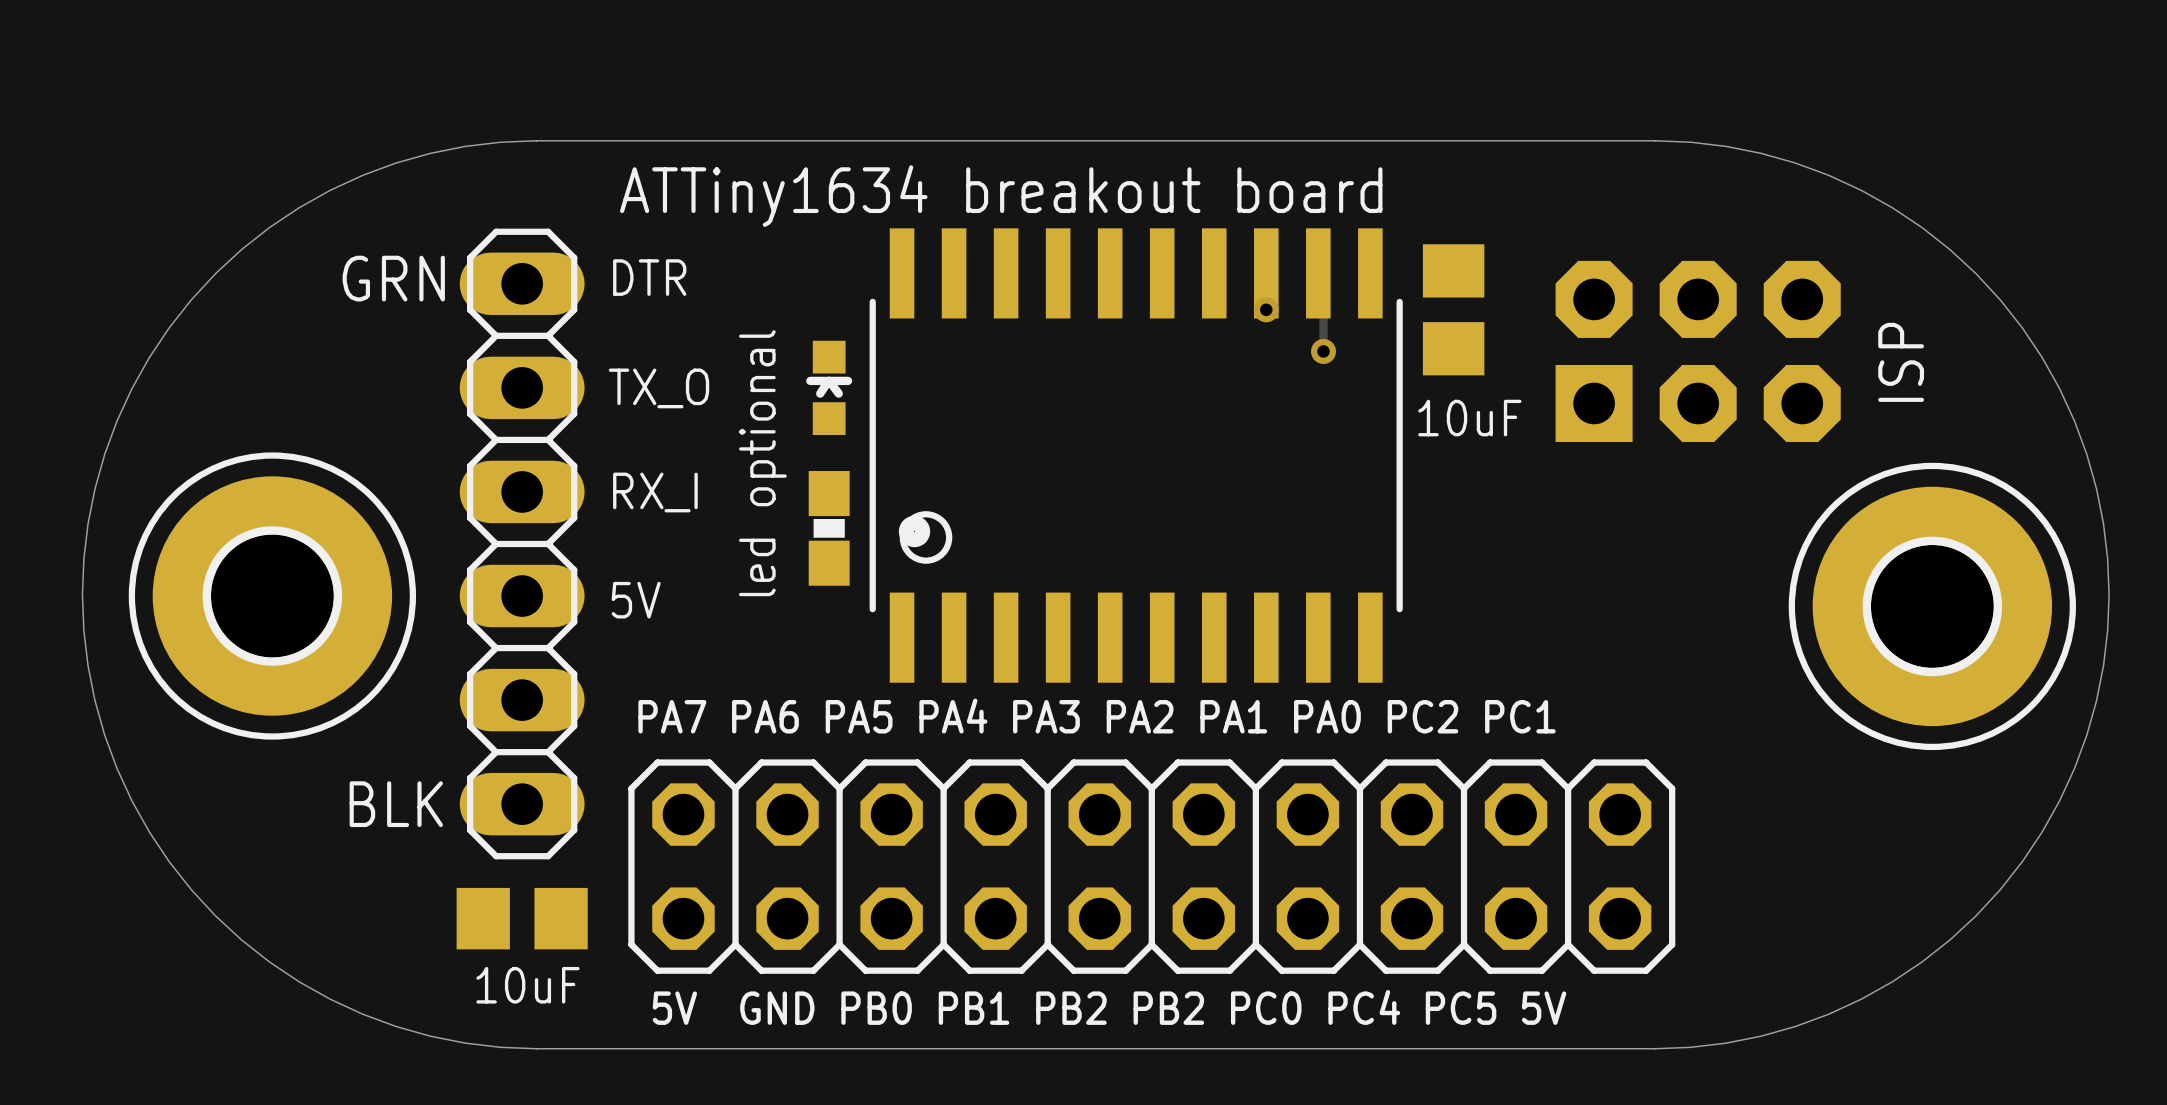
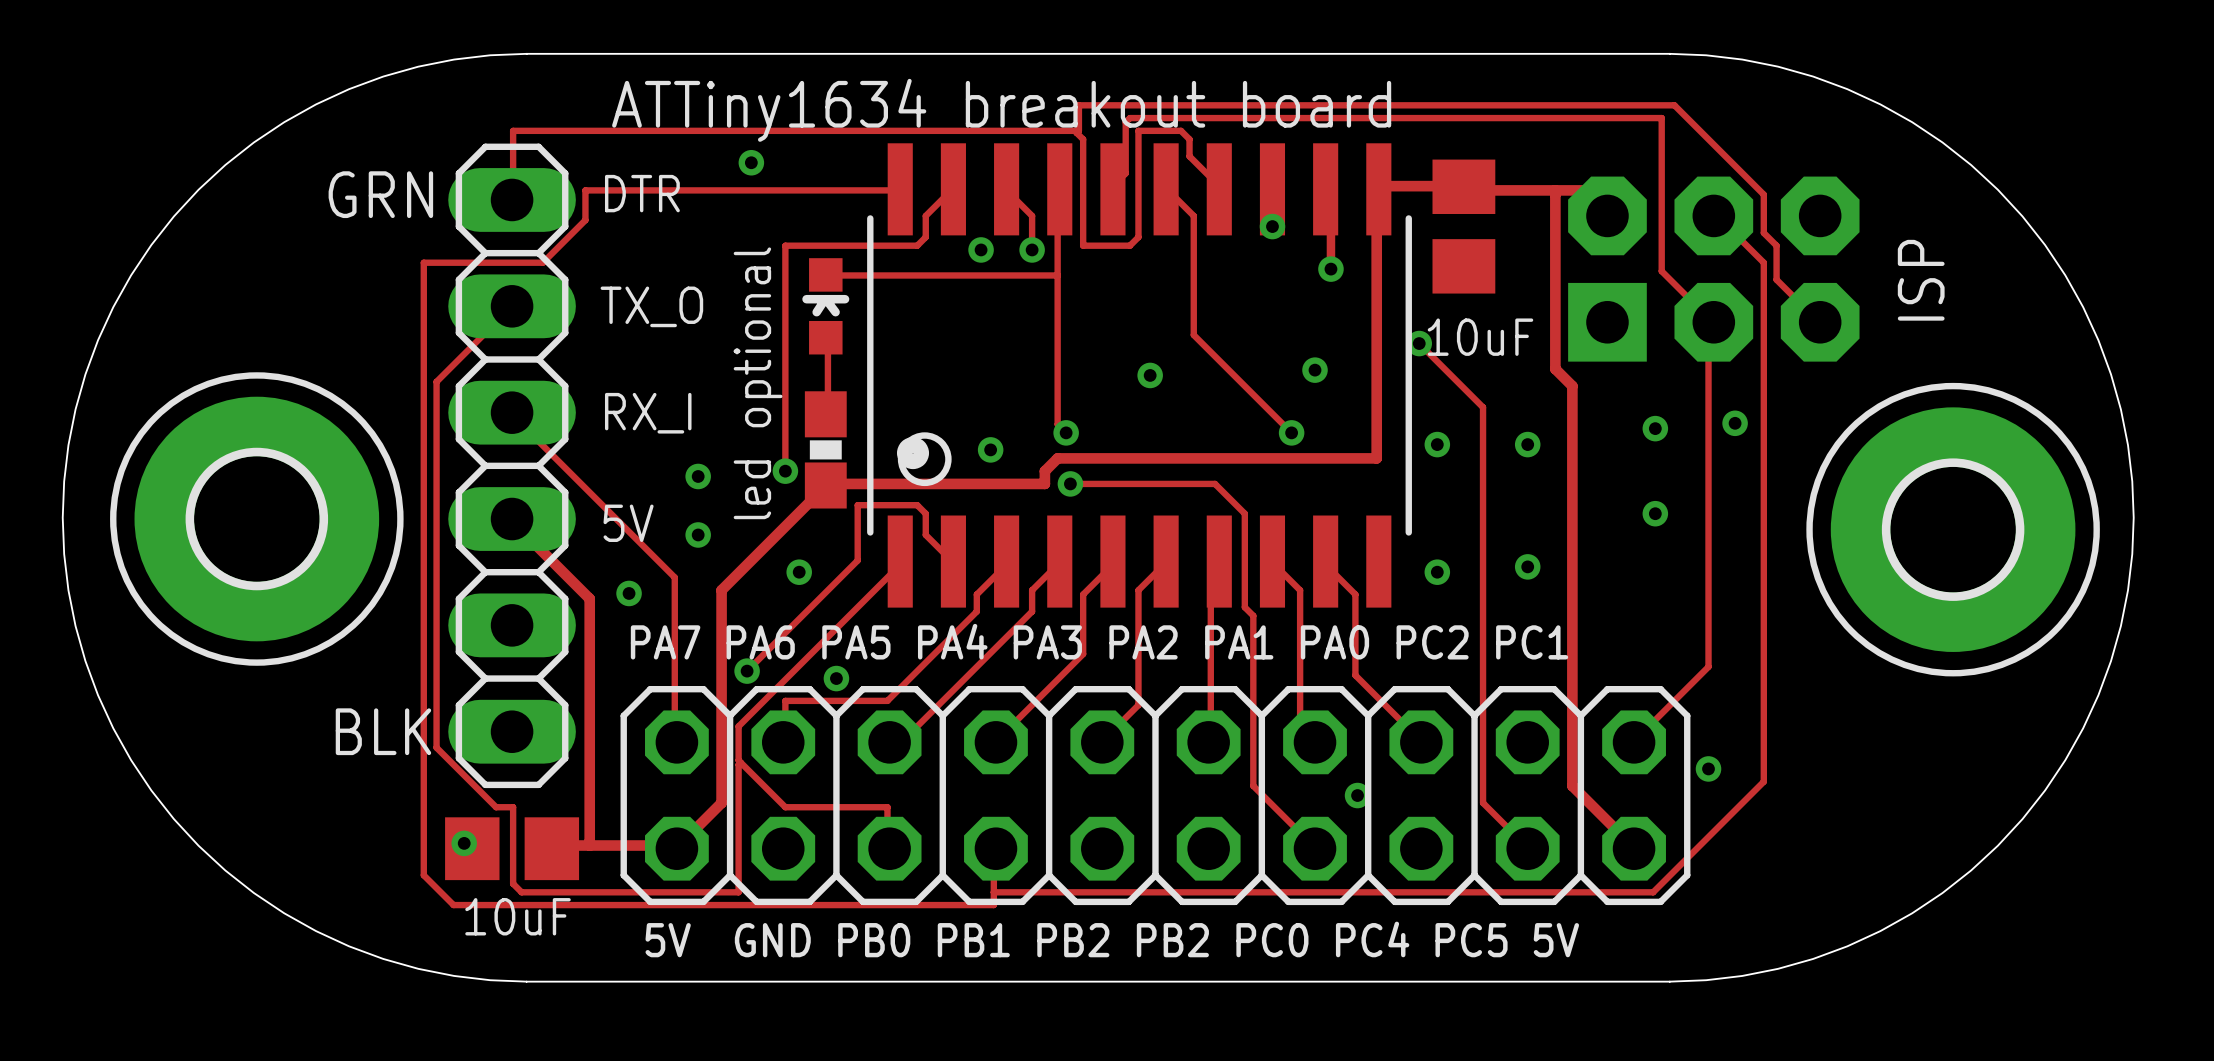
track: none -> (1076, 132) (1078, 130) (1078, 105) (1674, 105) (1763, 194) (1763, 232) (1776, 245) (1776, 279) (1820, 322)
via: none -> (751, 162)
track: none -> (900, 189) (585, 190) (585, 220) (542, 262) (423, 262) (423, 875) (453, 905) (993, 905) (993, 849) (995, 848)
track: none -> (953, 189) (925, 215) (925, 237) (917, 245) (785, 245) (785, 471)
track: none -> (1006, 189) (1032, 215) (1032, 249)
track: none -> (1059, 189) (1057, 190) (1057, 424) (1066, 432)
track: none -> (1112, 189) (1112, 186) (1125, 173) (1125, 122) (1129, 118) (1661, 118) (1661, 271) (1712, 322)
track: none -> (1166, 189) (1193, 215) (1193, 335) (1291, 432)
track: none -> (1219, 189) (1219, 186) (1189, 156) (1189, 139) (1181, 130) (1138, 130) (1138, 237) (1129, 245) (1083, 245) (1083, 139) (1074, 130) (513, 130) (512, 199)
track: none -> (1555, 190) (1555, 369) (1572, 386) (1572, 785) (1634, 848)
track: none -> (1607, 215) (1606, 190) (1466, 190) (1461, 186) (1380, 186) (1376, 190) (1376, 458) (1057, 458) (1044, 471) (1044, 483) (827, 483) (721, 590) (721, 802) (676, 848) (674, 845) (555, 845) (551, 848)
track: none -> (1713, 215) (1717, 215) (1763, 262) (1763, 781) (1653, 892) (993, 892)
via: none -> (981, 249)
via: none -> (1032, 249)
track: none -> (825, 274) (1057, 275)
track: none -> (512, 306) (436, 381) (436, 747) (496, 807) (513, 807) (513, 883) (521, 892) (738, 892) (738, 764) (740, 762)
track: none -> (1713, 322) (1708, 322) (1708, 666) (1634, 742)
track: none -> (825, 337) (827, 339) (827, 411) (825, 414)
track: none -> (1419, 343) (1483, 407) (1483, 802) (1527, 848)
via: none -> (1419, 343)
via: none -> (1315, 370)
via: none -> (1150, 375)
track: none -> (512, 412) (674, 577) (674, 739) (676, 742)
via: none -> (1735, 423)
via: none -> (1655, 428)
via: none -> (1066, 432)
via: none -> (1291, 432)
via: none -> (1437, 444)
via: none -> (1527, 444)
via: none -> (990, 449)
via: none -> (785, 471)
via: none -> (698, 476)
track: none -> (1070, 483) (1215, 483) (1244, 513) (1244, 607) (1253, 615) (1253, 785) (1315, 848)
via: none -> (1070, 483)
via: none -> (1655, 513)
track: none -> (512, 519) (589, 598) (589, 845)
via: none -> (698, 534)
track: none -> (900, 561) (900, 564) (738, 726) (738, 760) (785, 807) (887, 807) (887, 845) (889, 848)
track: none -> (953, 561) (925, 534) (925, 513) (917, 505) (857, 505) (857, 560) (747, 671)
track: none -> (1006, 561) (1006, 564) (976, 594) (976, 611) (887, 700) (785, 700) (785, 739) (783, 742)
track: none -> (1059, 561) (1032, 590) (1032, 611) (904, 739) (891, 739) (889, 742)
track: none -> (1112, 561) (1112, 564) (1083, 594) (1083, 654) (995, 742)
track: none -> (1166, 561) (1138, 590) (1138, 705) (1102, 742)
track: none -> (1219, 561) (1219, 564) (1210, 573) (1210, 739) (1208, 742)
track: none -> (1272, 561) (1300, 590) (1300, 726) (1315, 742)
track: none -> (1325, 561) (1325, 564) (1355, 594) (1355, 675) (1421, 742)
via: none -> (1527, 566)
via: none -> (799, 572)
via: none -> (1437, 572)
via: none -> (629, 593)
via: none -> (747, 671)
via: none -> (836, 678)
via: none -> (1708, 768)
via: none -> (1357, 795)
via: none -> (464, 843)

